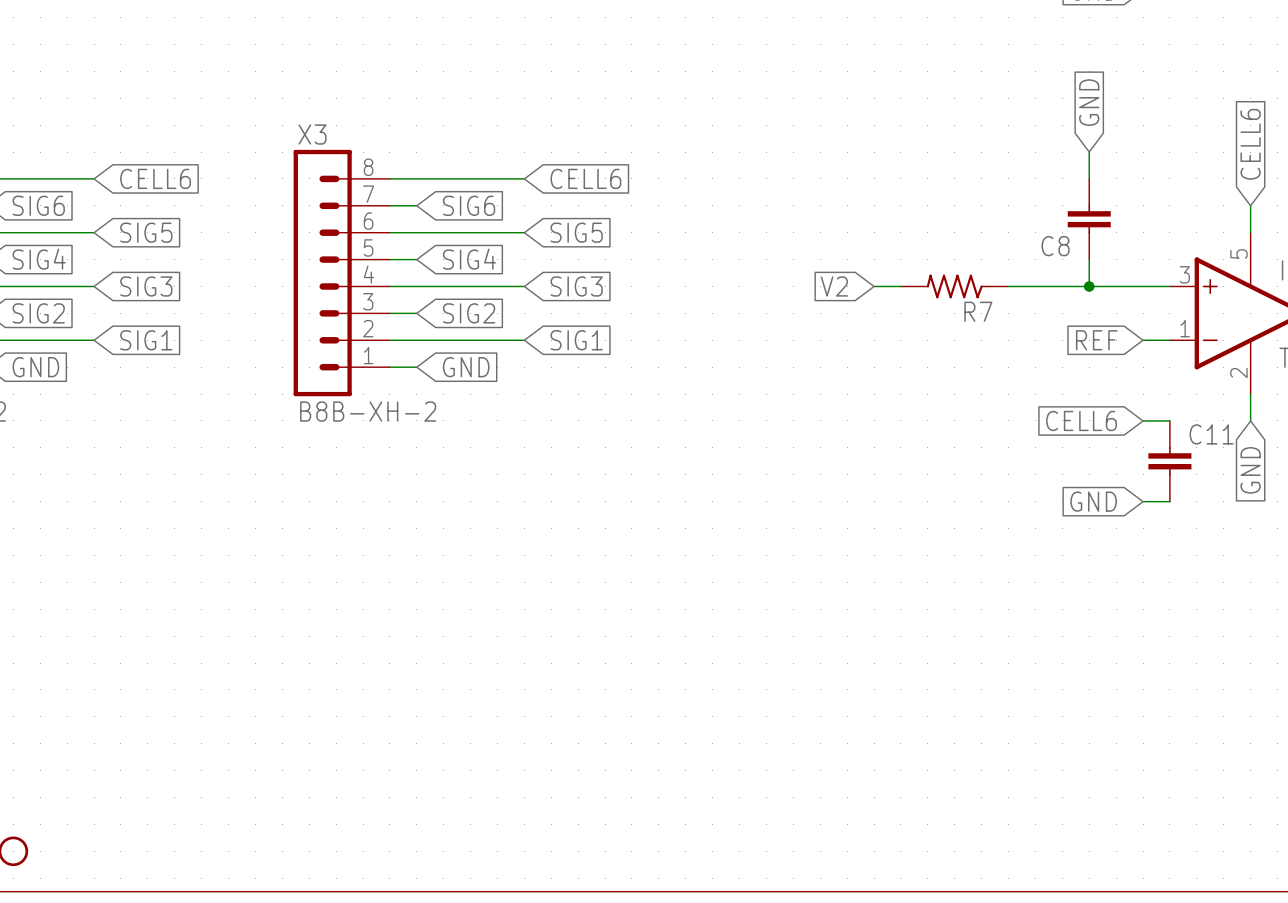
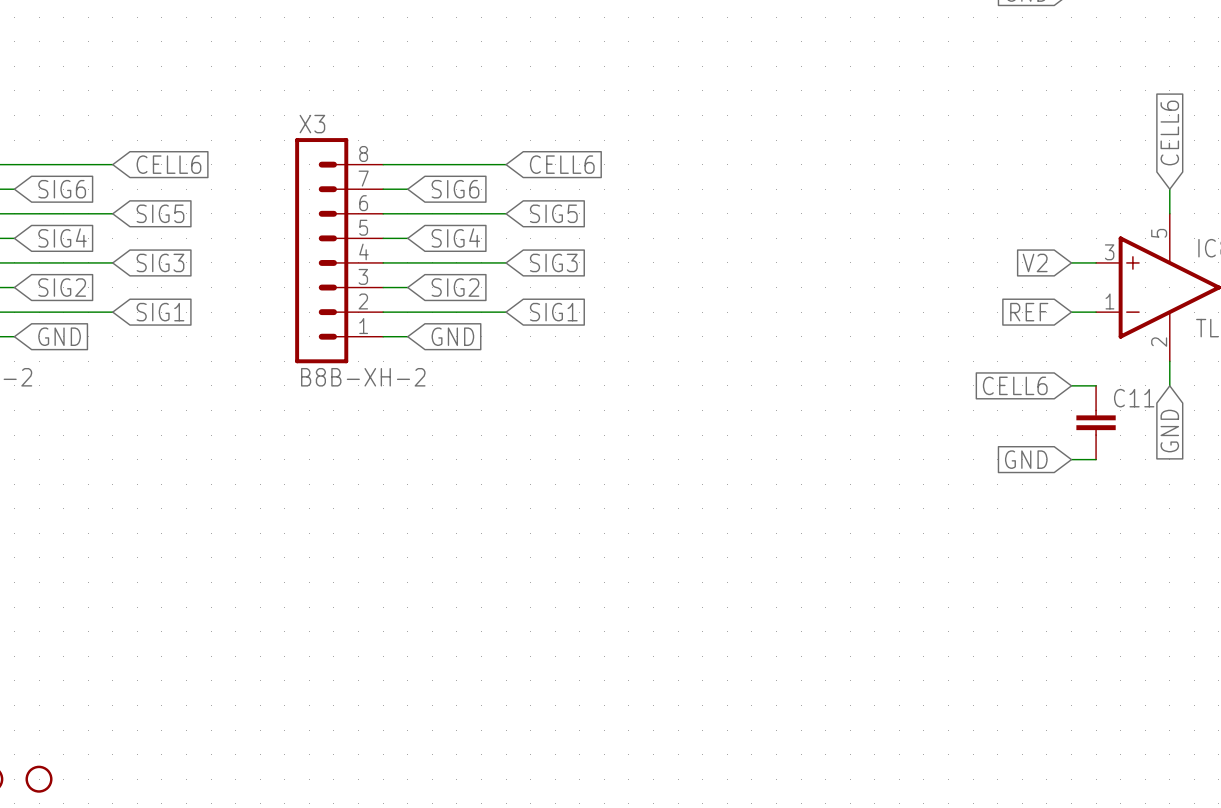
global label: GND (1089, 102) -> none
wire: (1089, 152) (1089, 178) -> none
C8: (1089, 219) -> none
wire: (1089, 259) (1089, 286) -> none
global label: V2 (834, 286) -> none
wire: (874, 286) (900, 286) -> none
R7: (954, 286) -> none
wire: (1008, 286) (1143, 286) -> none
junction: (1089, 286) -> none
global label: none -> V2 (1035, 262)

